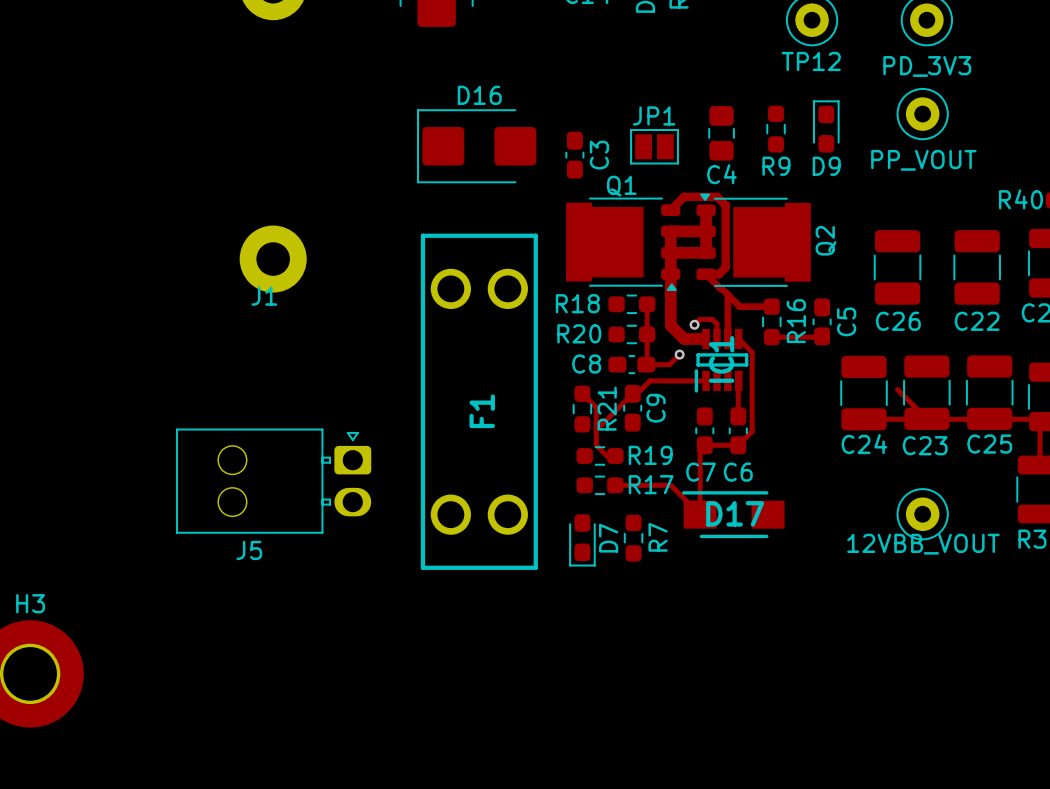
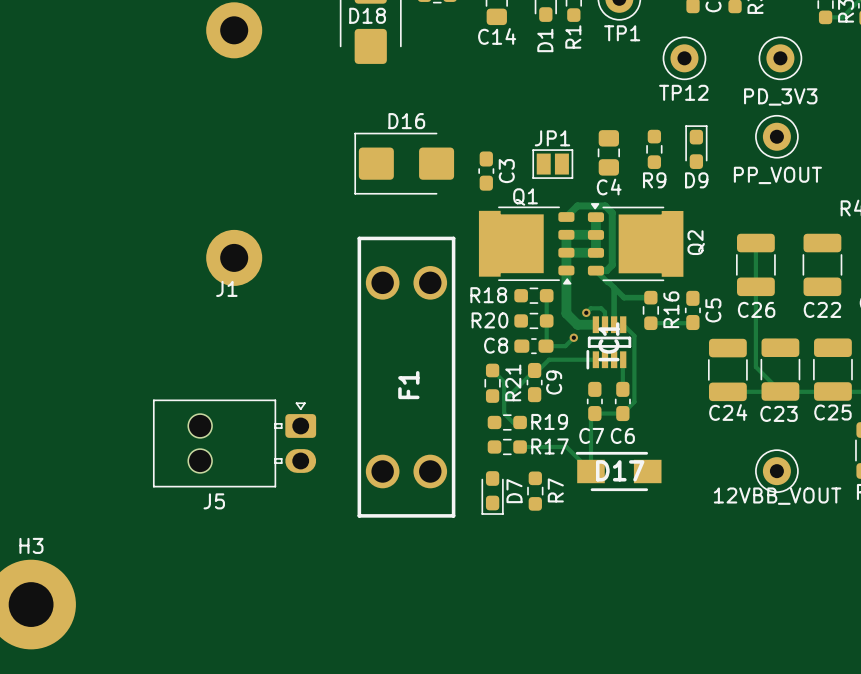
track: none -> (755, 243) (755, 366)

